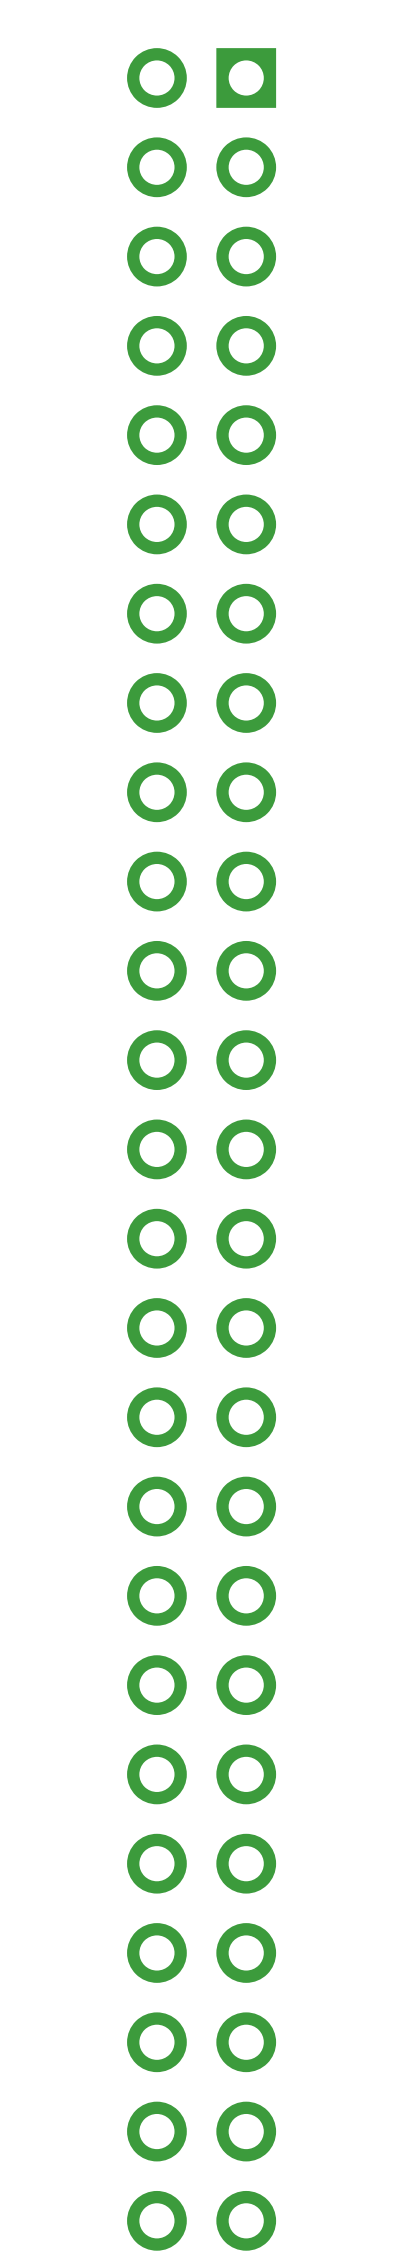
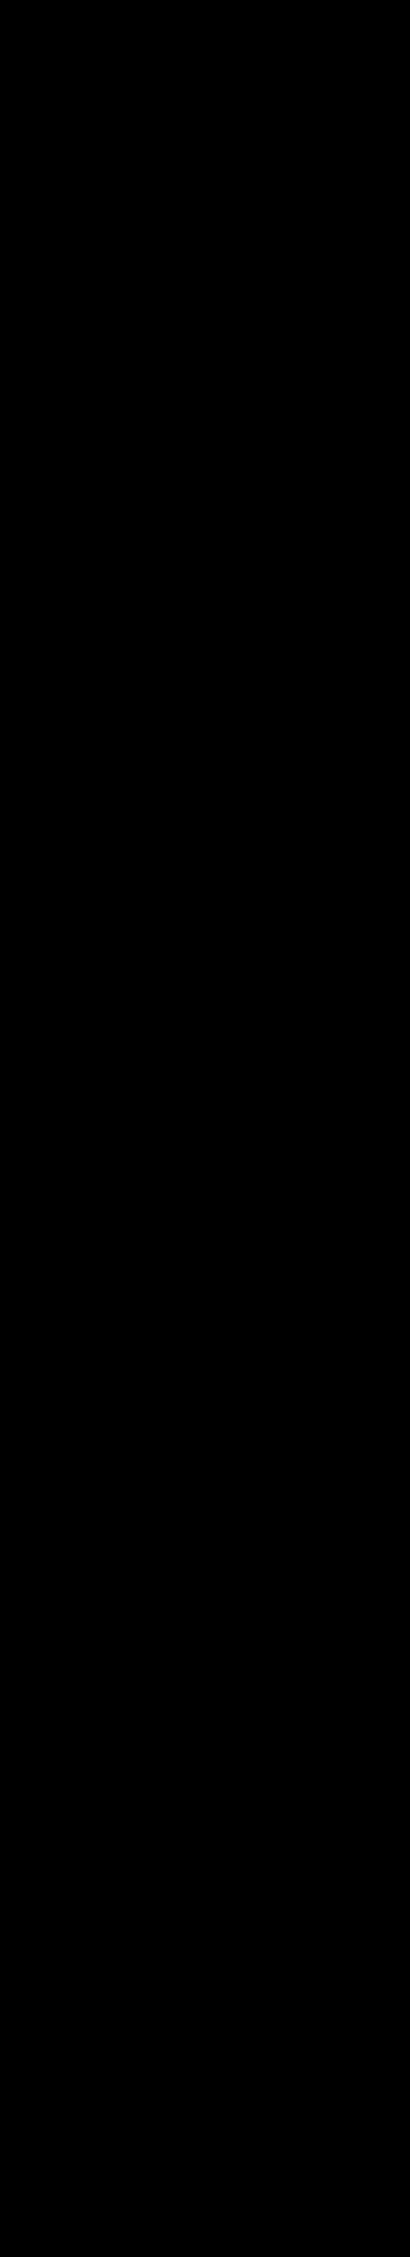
part: (201, 1149) -> none

